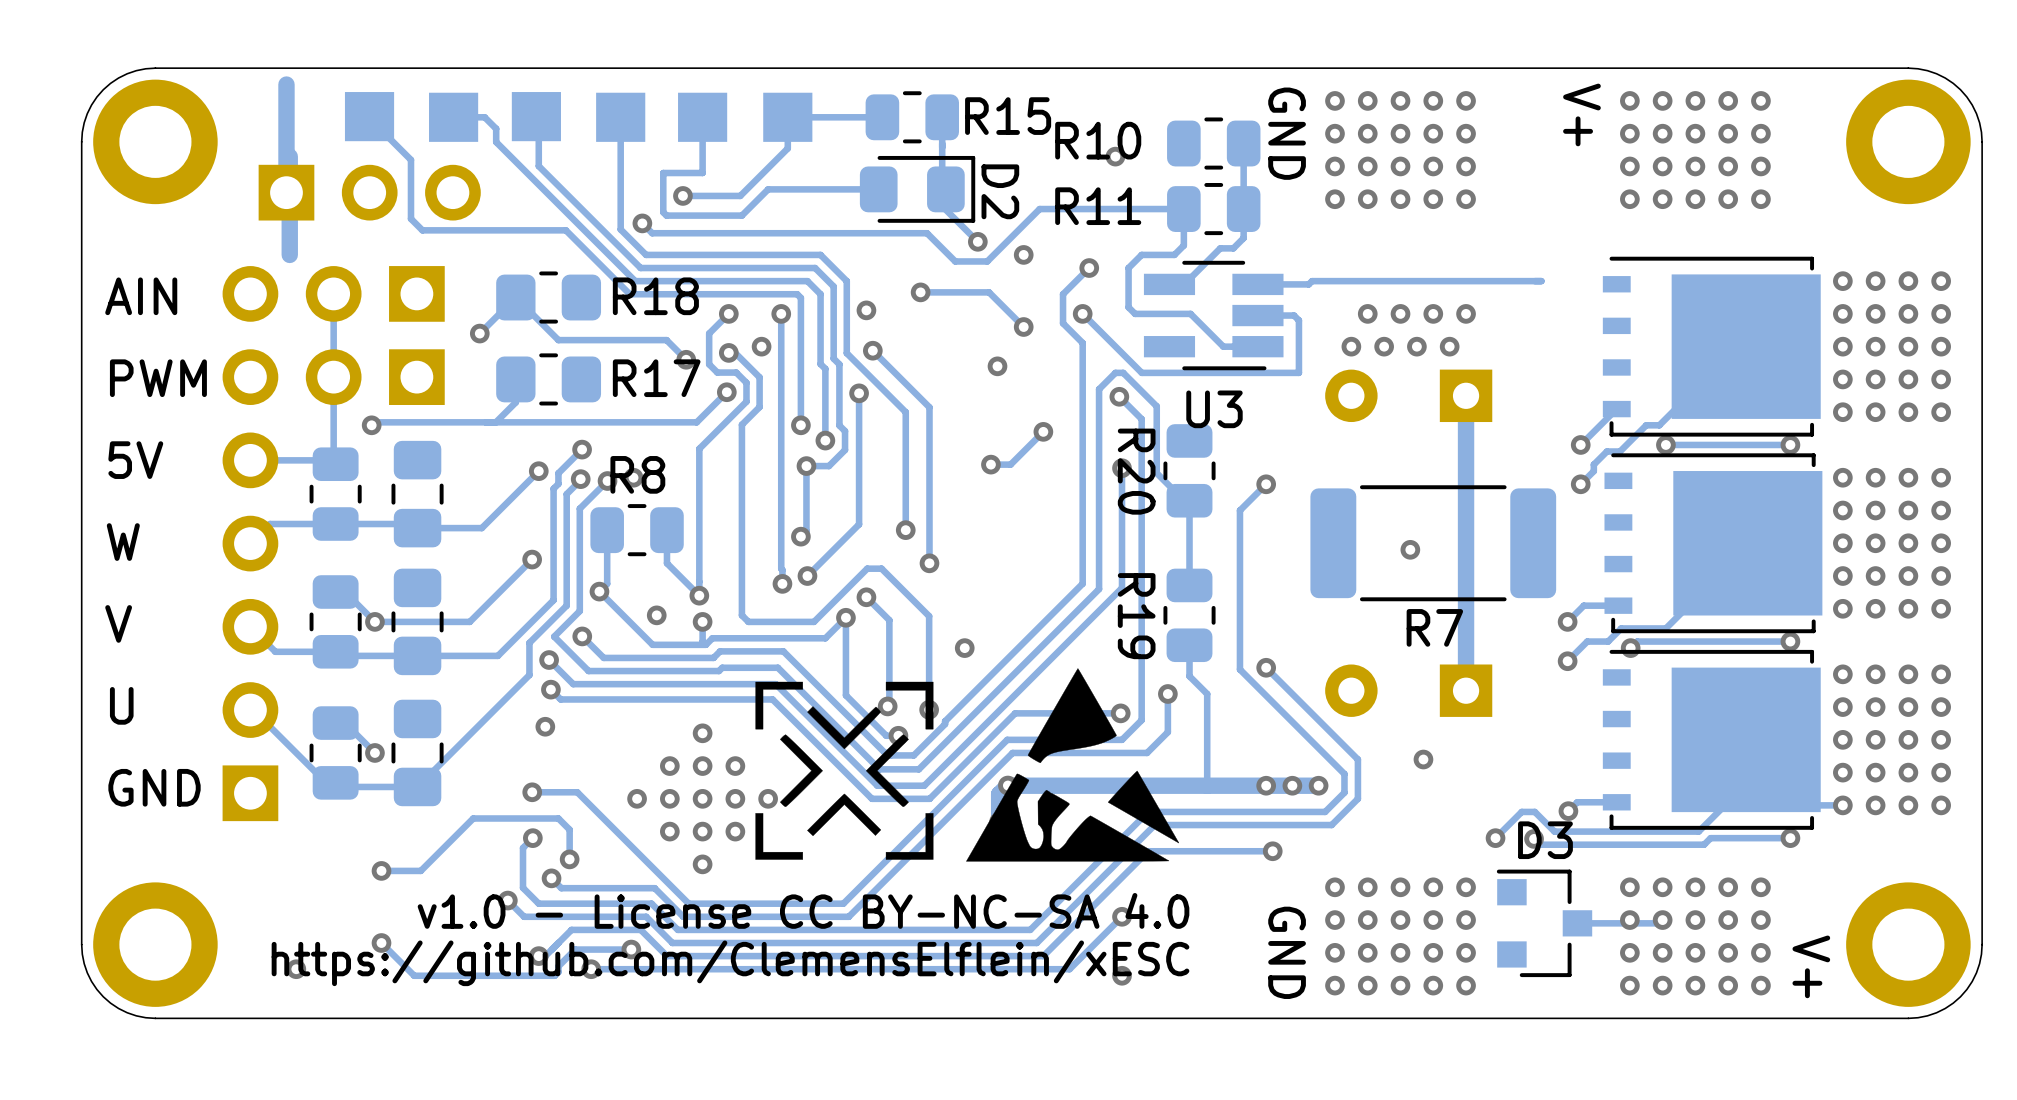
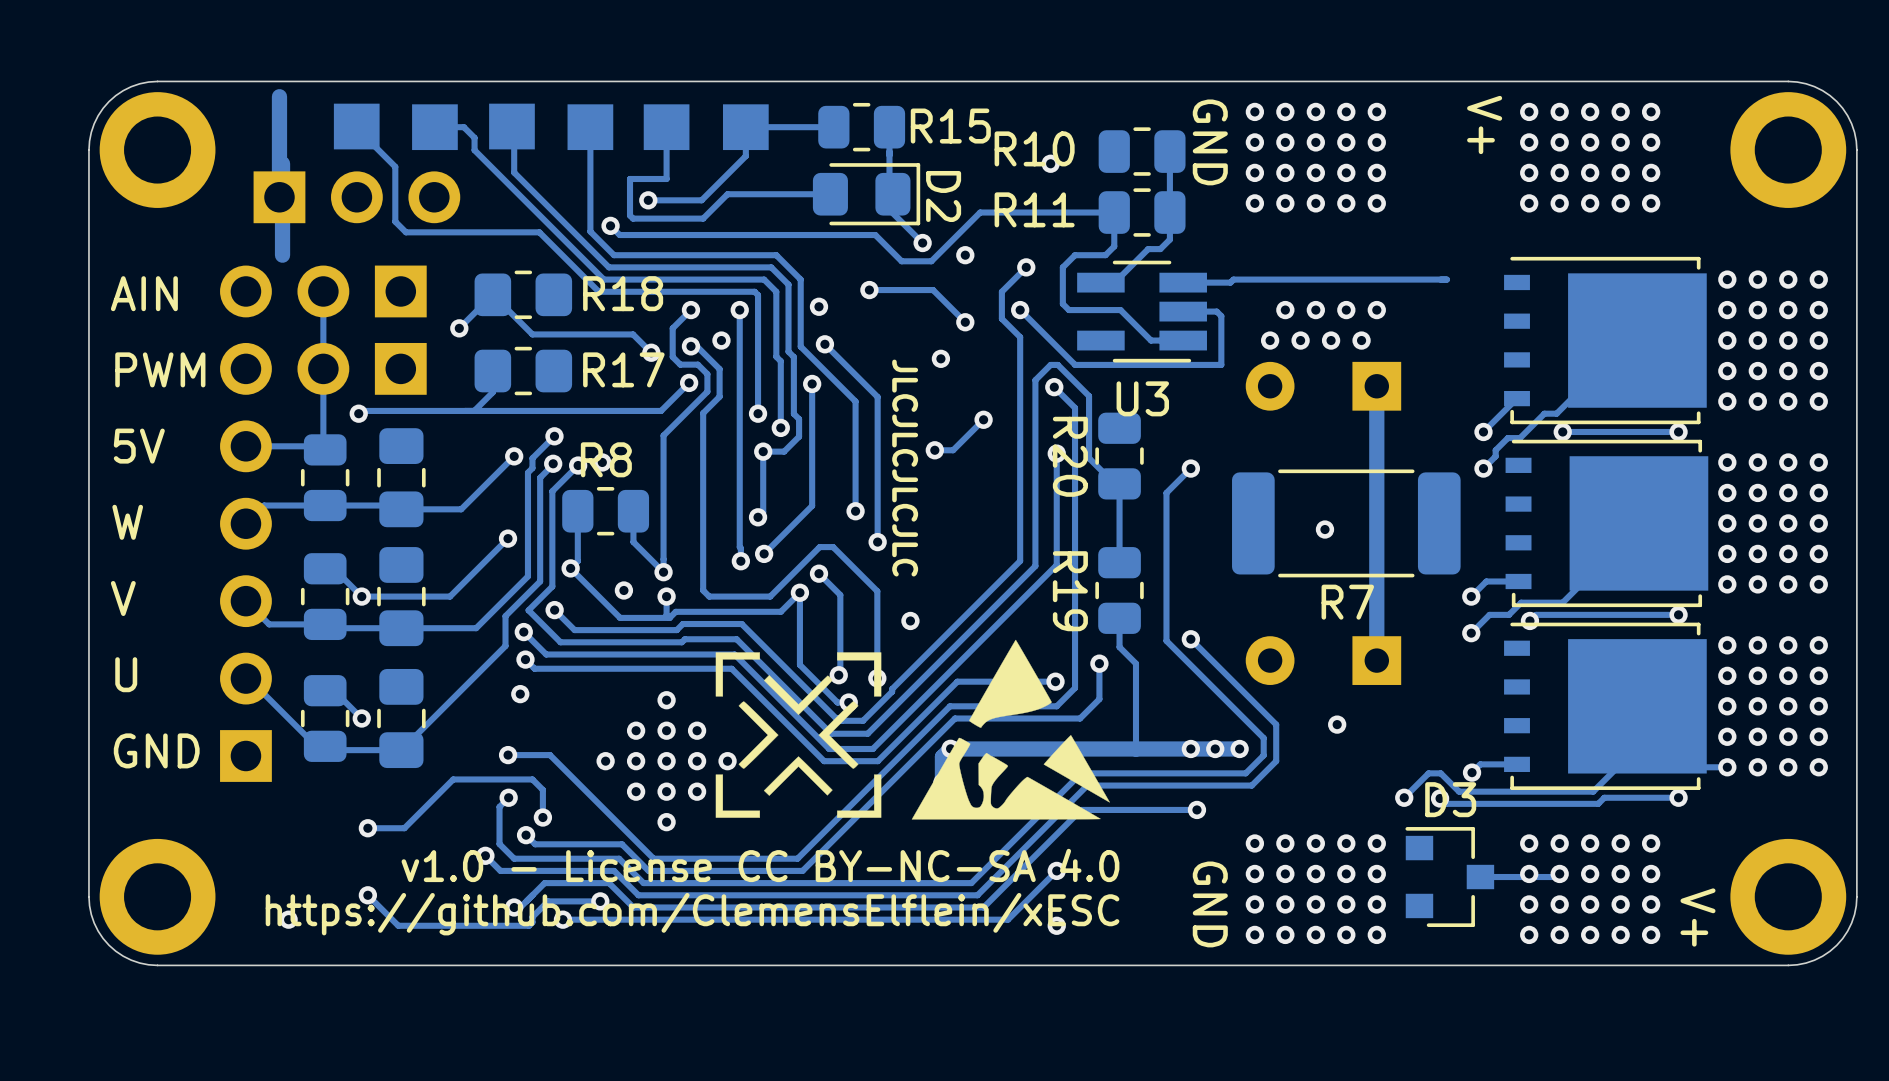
text: none -> JLCJLCJLCJLC (905, 468)

